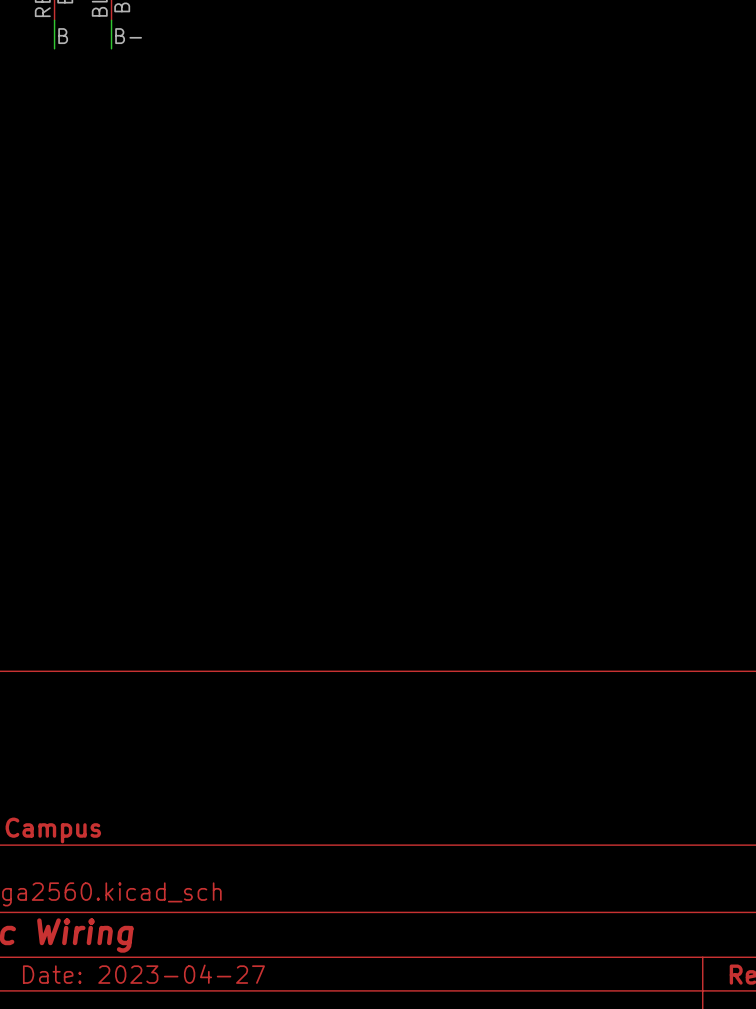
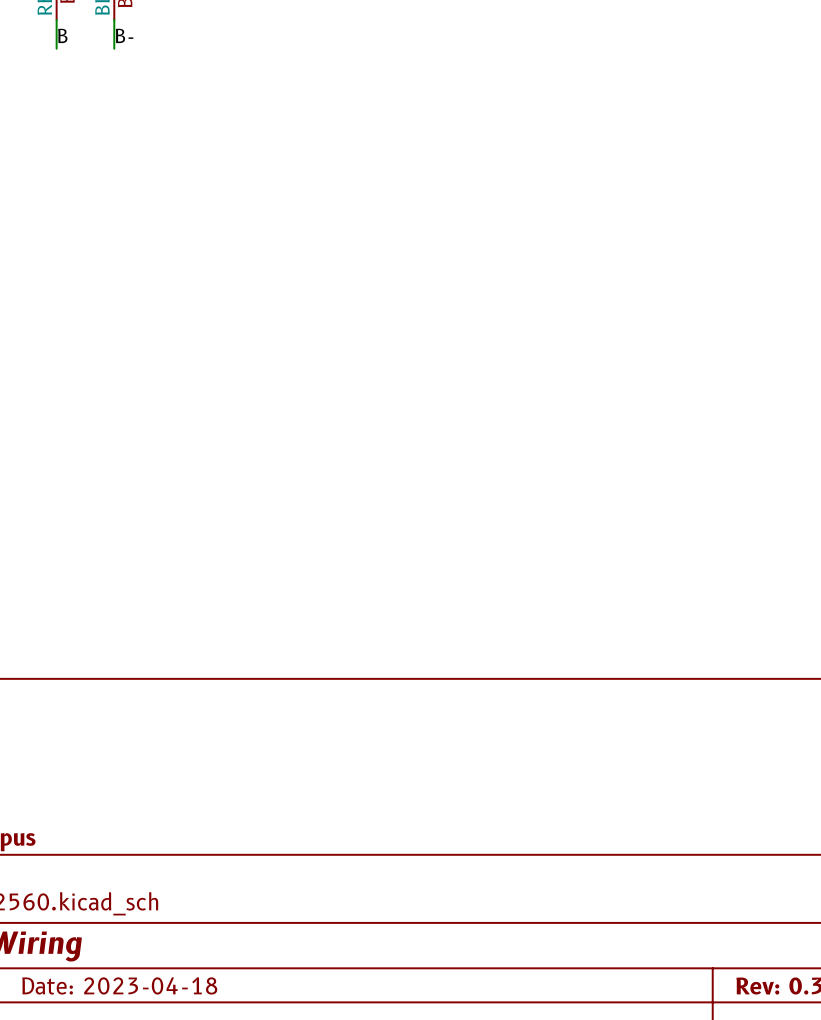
title block: Date: 2023-04-27 (143, 974) -> Date: 2023-04-18 (119, 985)

